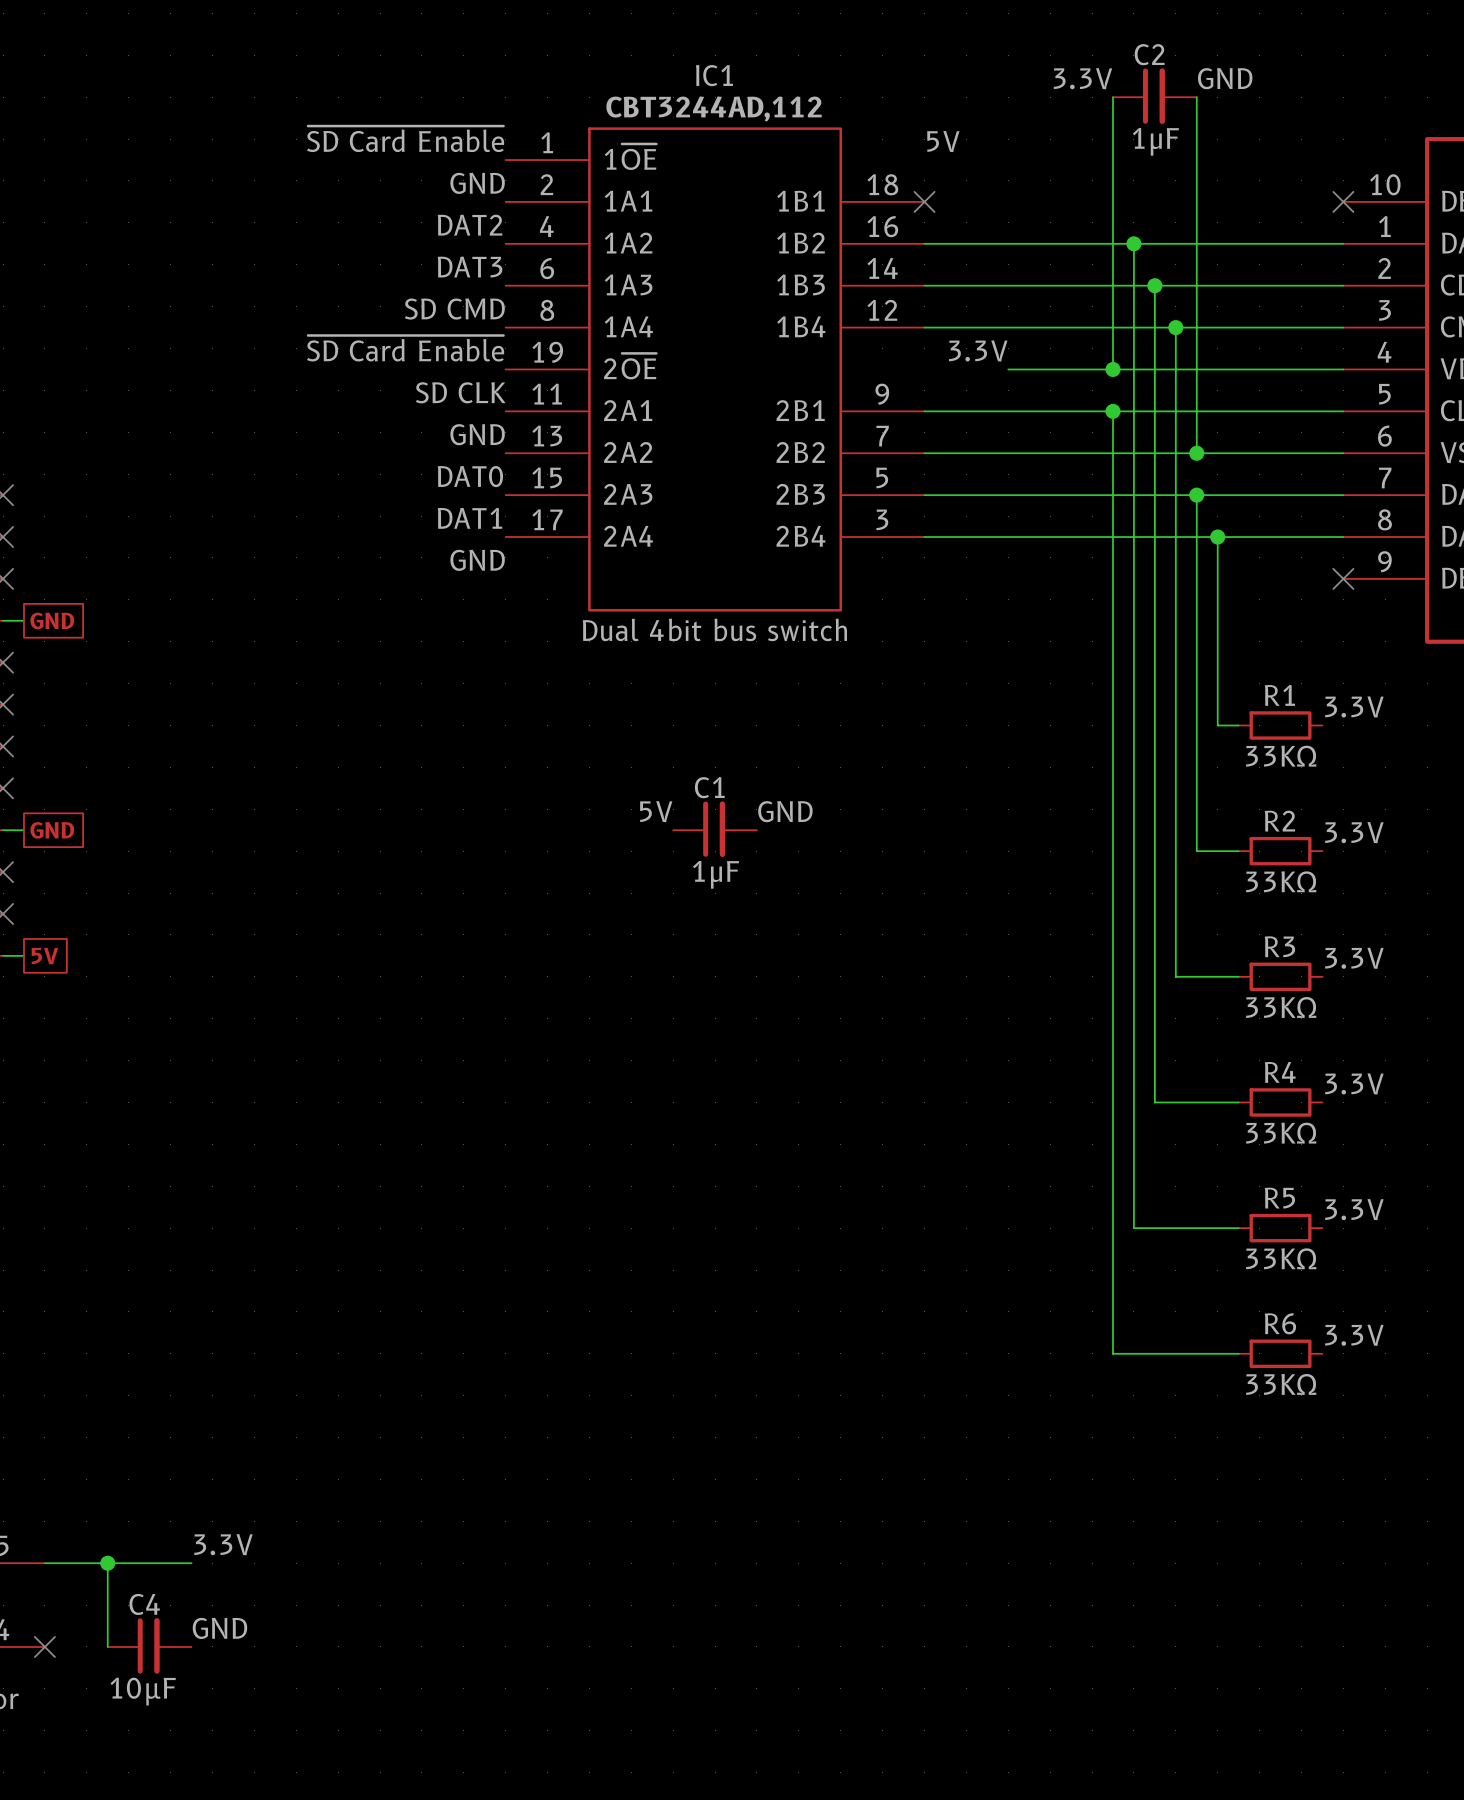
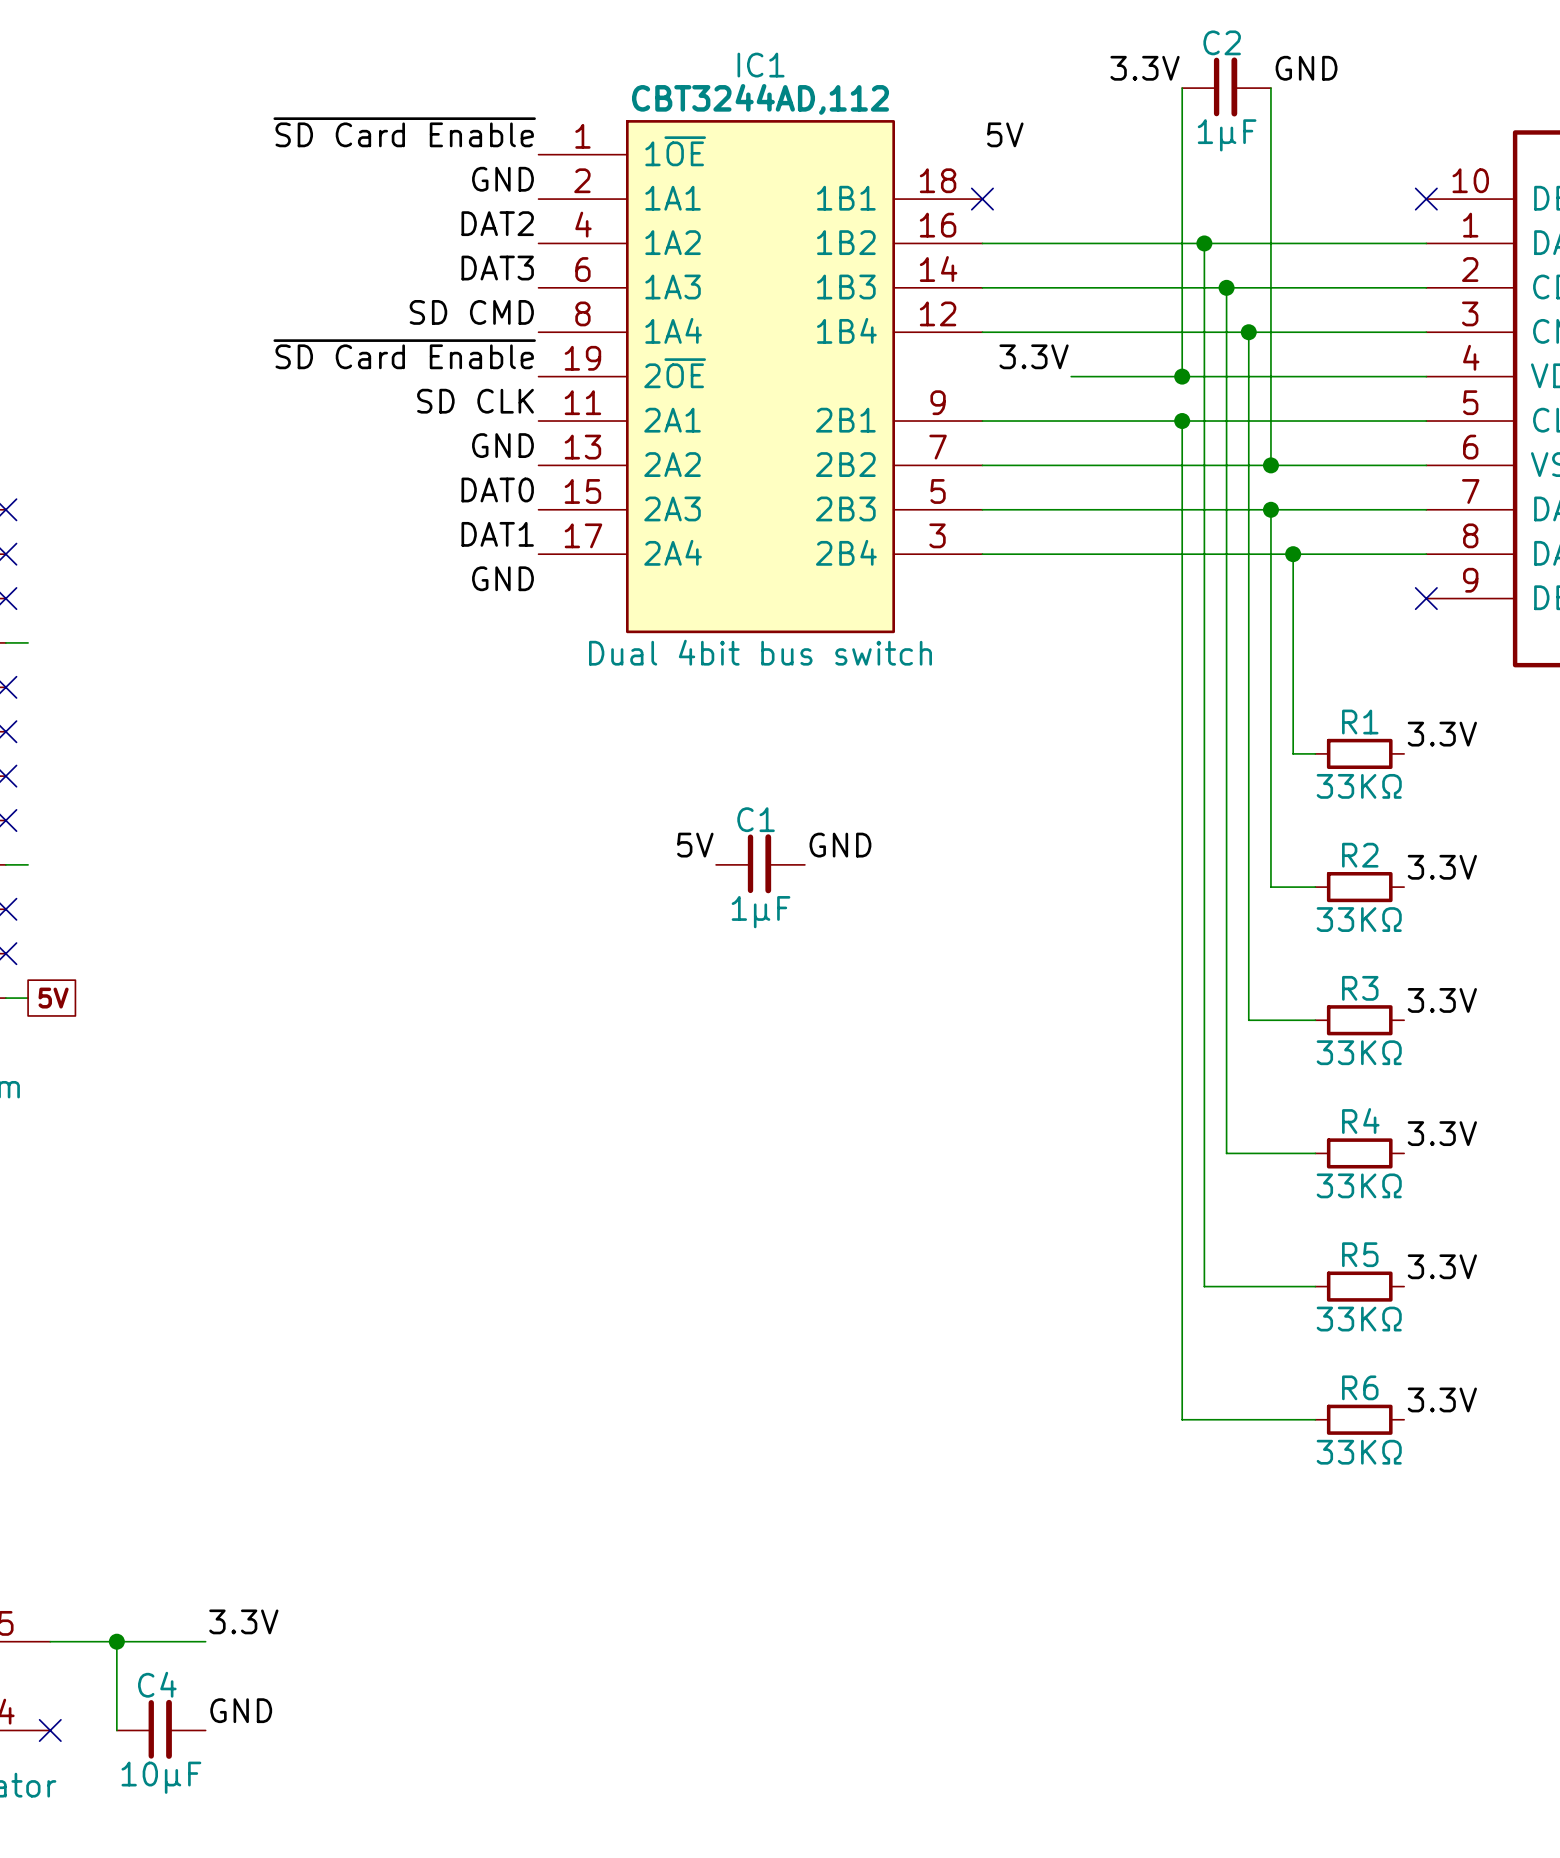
global label: GND (52, 620) -> none
global label: GND (52, 830) -> none

